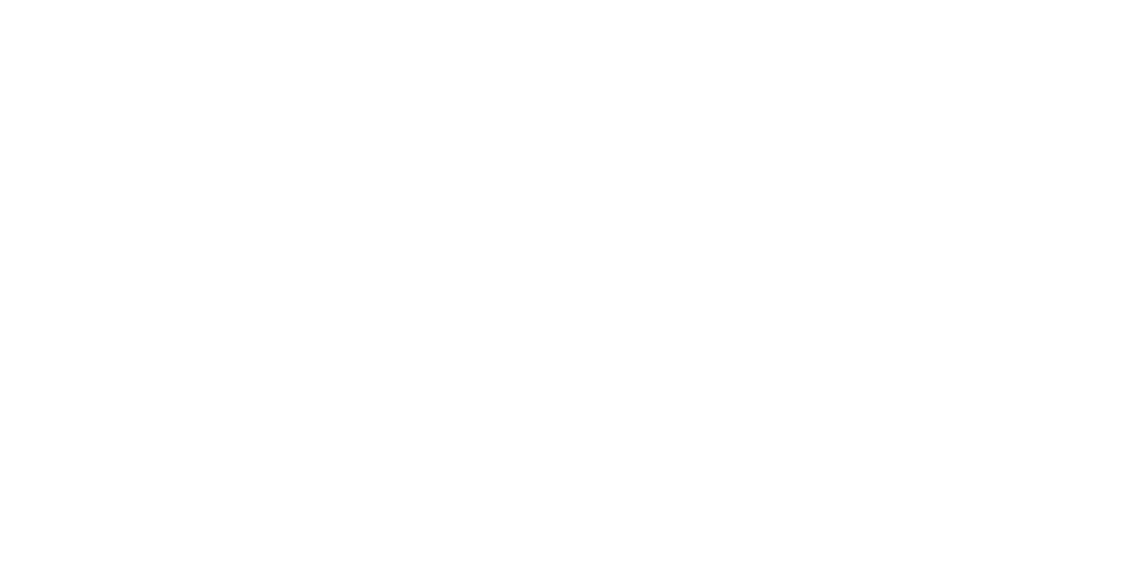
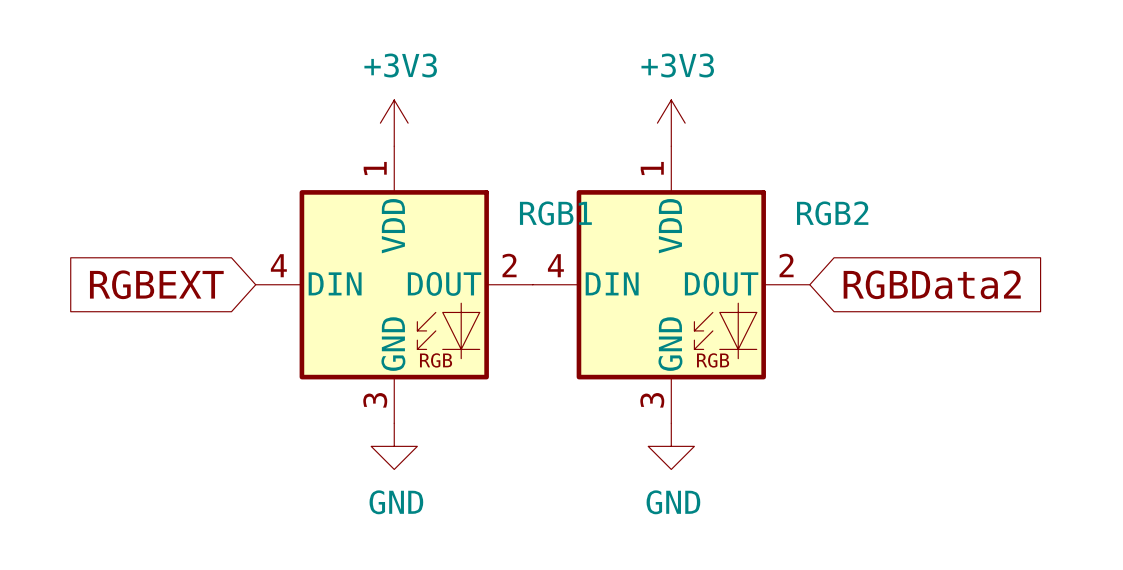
power symbol: none -> +3V3 (394, 123)
power symbol: none -> +3V3 (671, 123)
global label: none -> RGBEXT (156, 284)
RGB1: none -> (394, 284)
RGB2: none -> (671, 284)
global label: none -> RGBData2 (932, 284)
power symbol: none -> GND (394, 446)
power symbol: none -> GND (671, 446)

